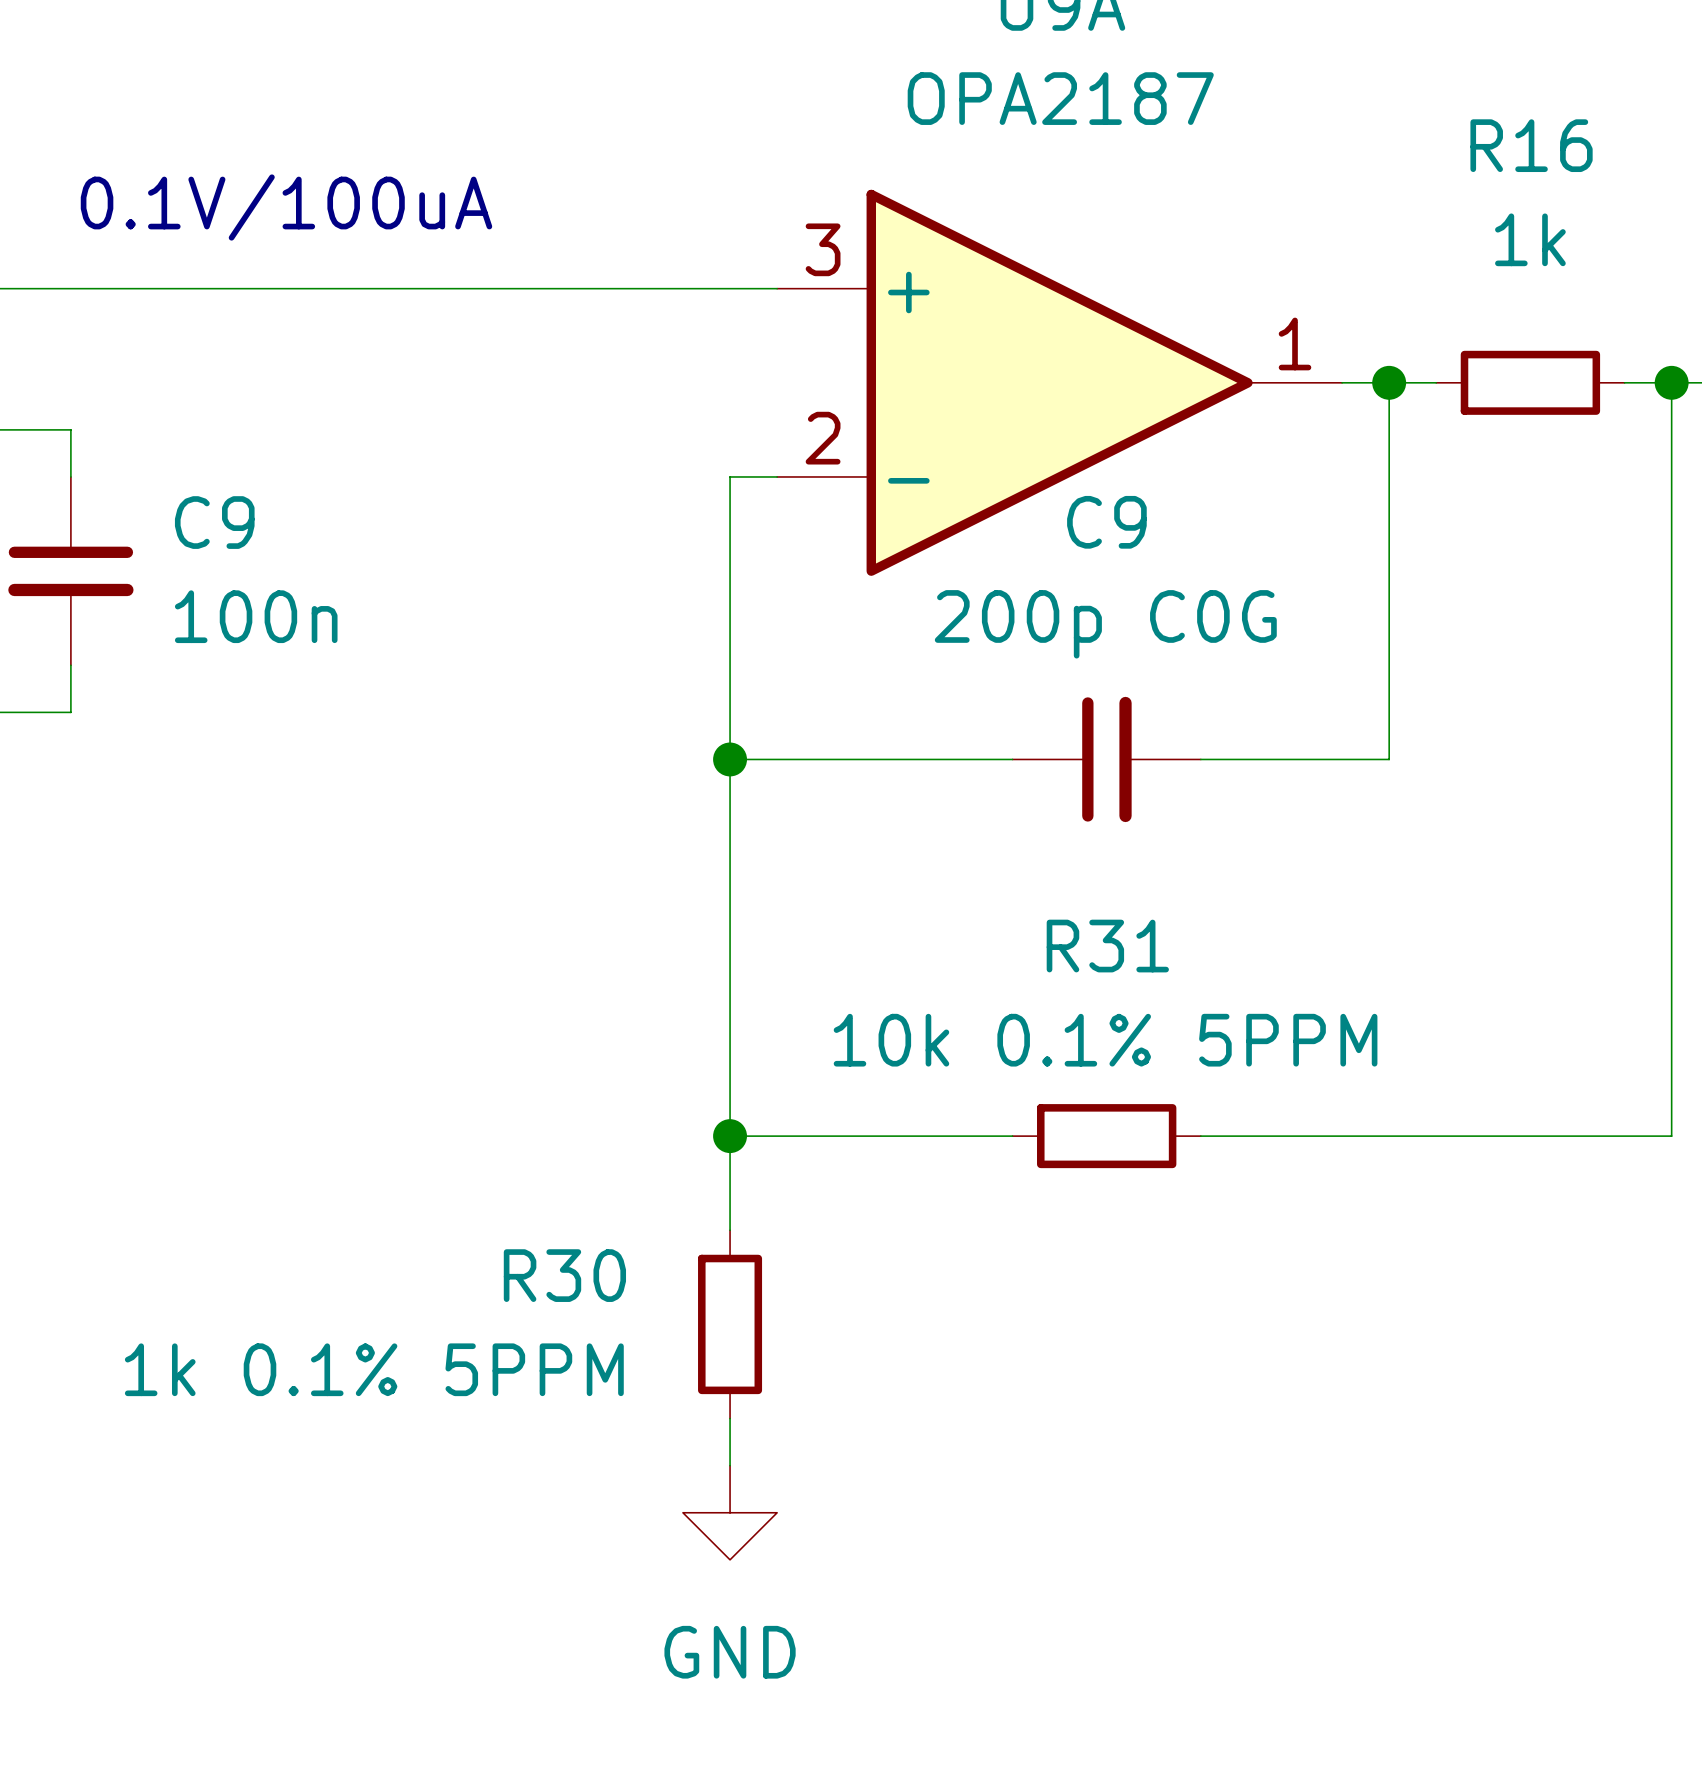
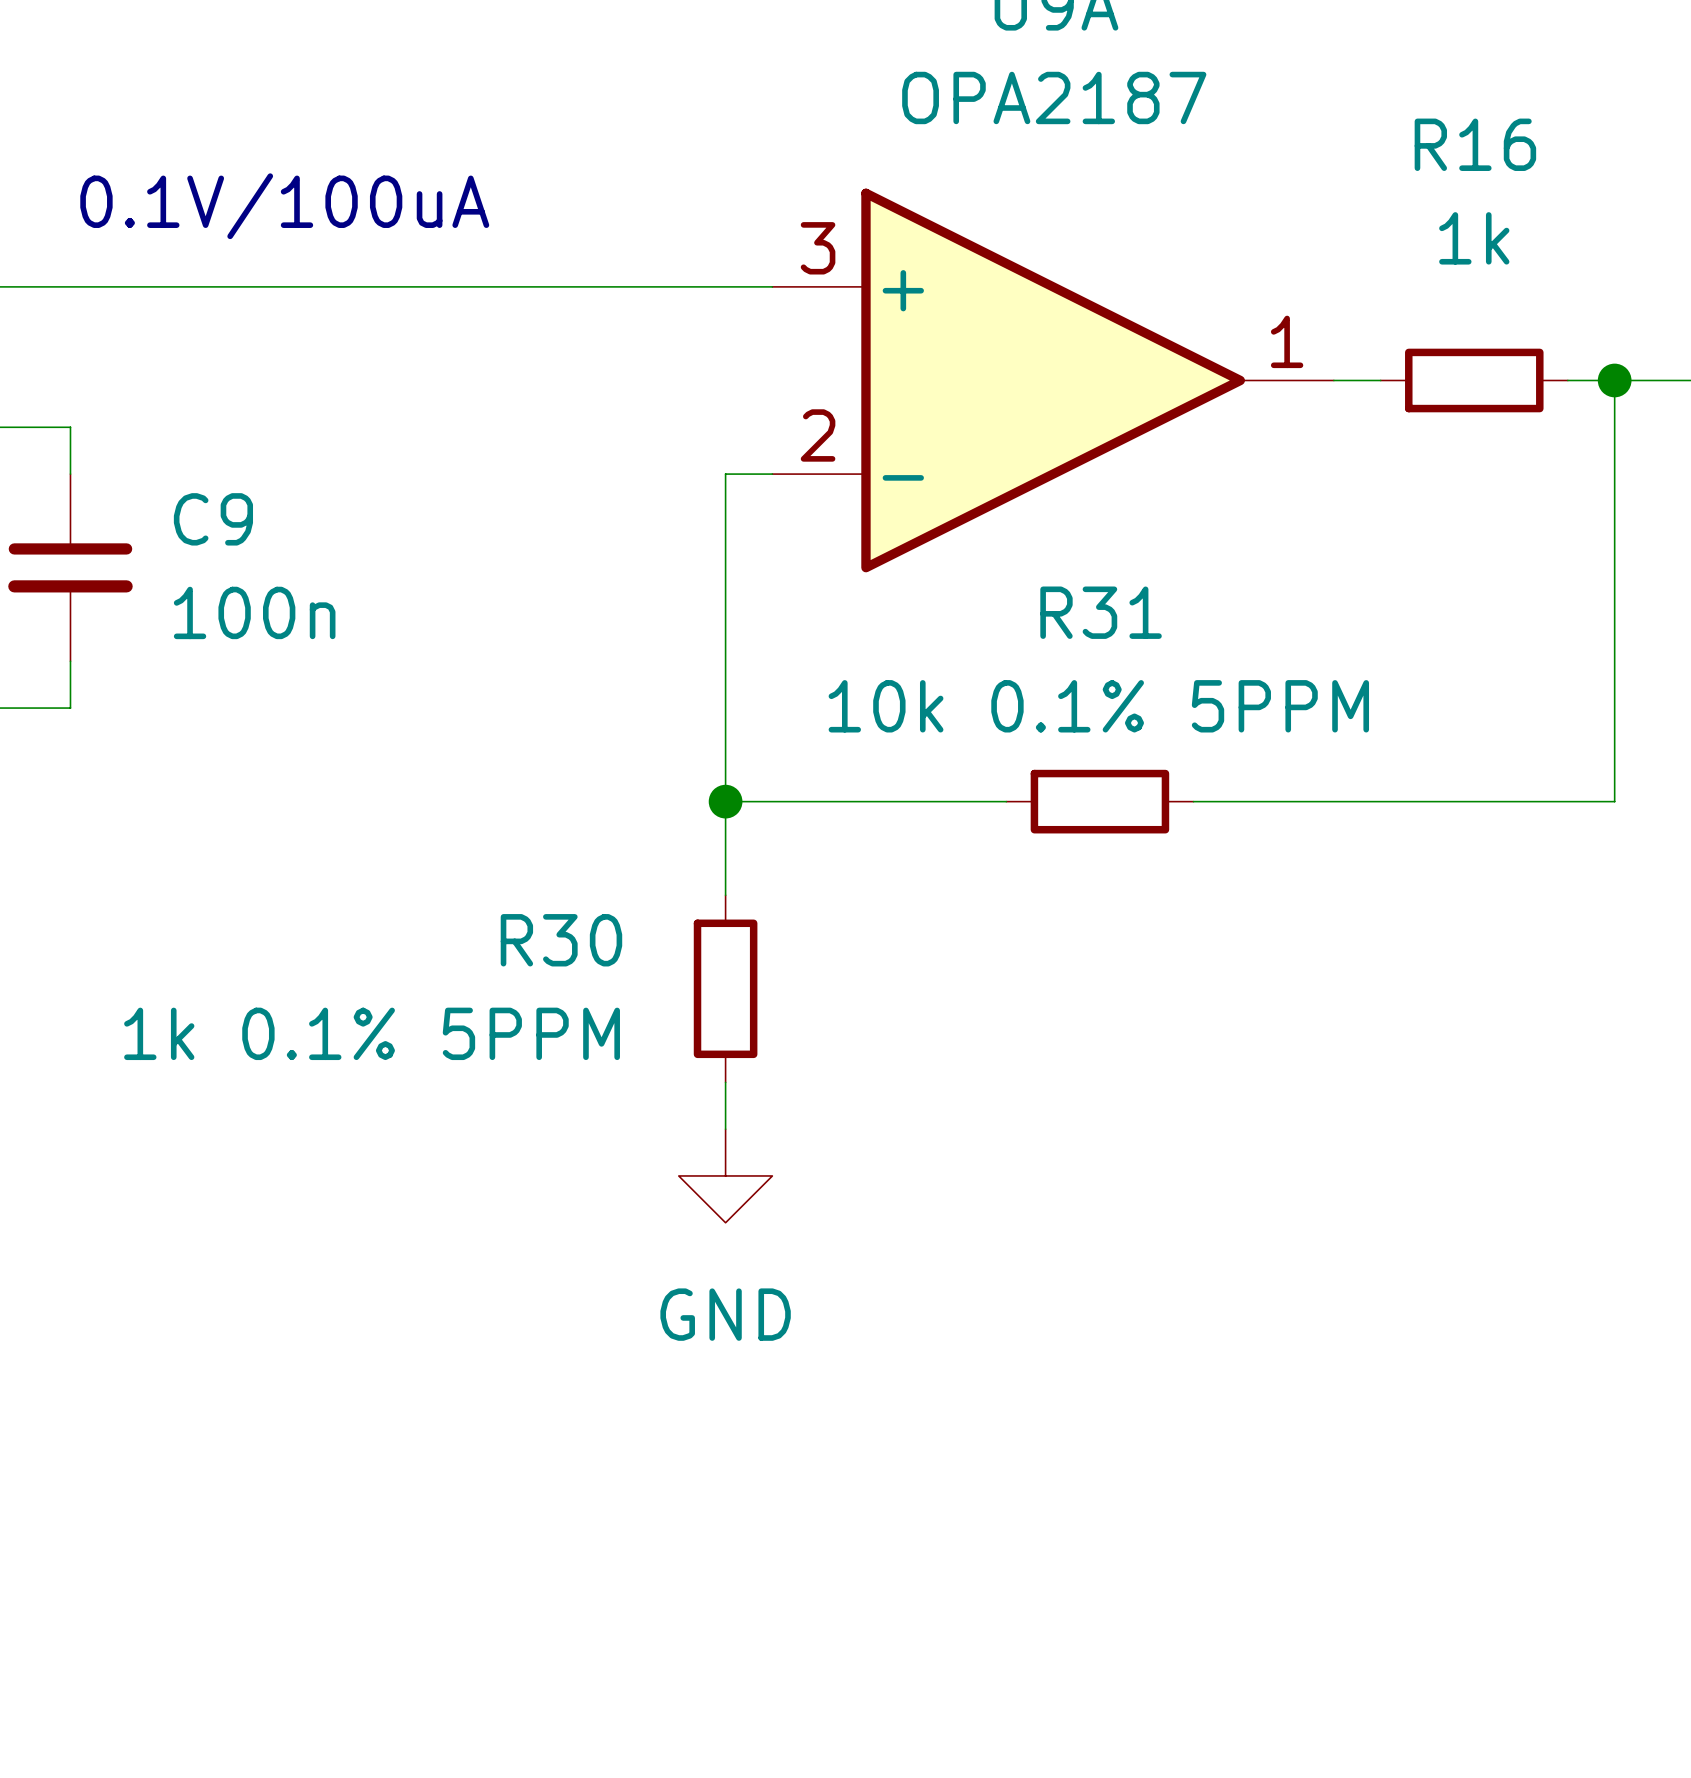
junction: (1389, 382) -> none
wire: (1436, 382) (1389, 382) (1389, 759) (1200, 759) -> none
R16 position: (1530, 382) -> (1474, 380)
wire: none -> (1567, 380) (1614, 380) (1614, 801) (1193, 801)
wire: (1671, 382) (1671, 1136) (1200, 1136) -> none
junction position: (1671, 382) -> (1614, 380)
wire: (730, 759) (1012, 759) -> (725, 801) (1006, 801)
junction position: (730, 759) -> (725, 801)
C9: 200p C0G (1106, 759) -> none
wire: (730, 900) (730, 1089) -> none
junction: (730, 1136) -> none
wire: (1012, 1136) (730, 1136) (730, 1230) -> none
R31 position: (1106, 1136) -> (1099, 801)
R30 position: (730, 1324) -> (725, 988)
wire: (730, 1418) (730, 1465) -> none
power symbol position: GND (730, 1512) -> GND (725, 1175)

